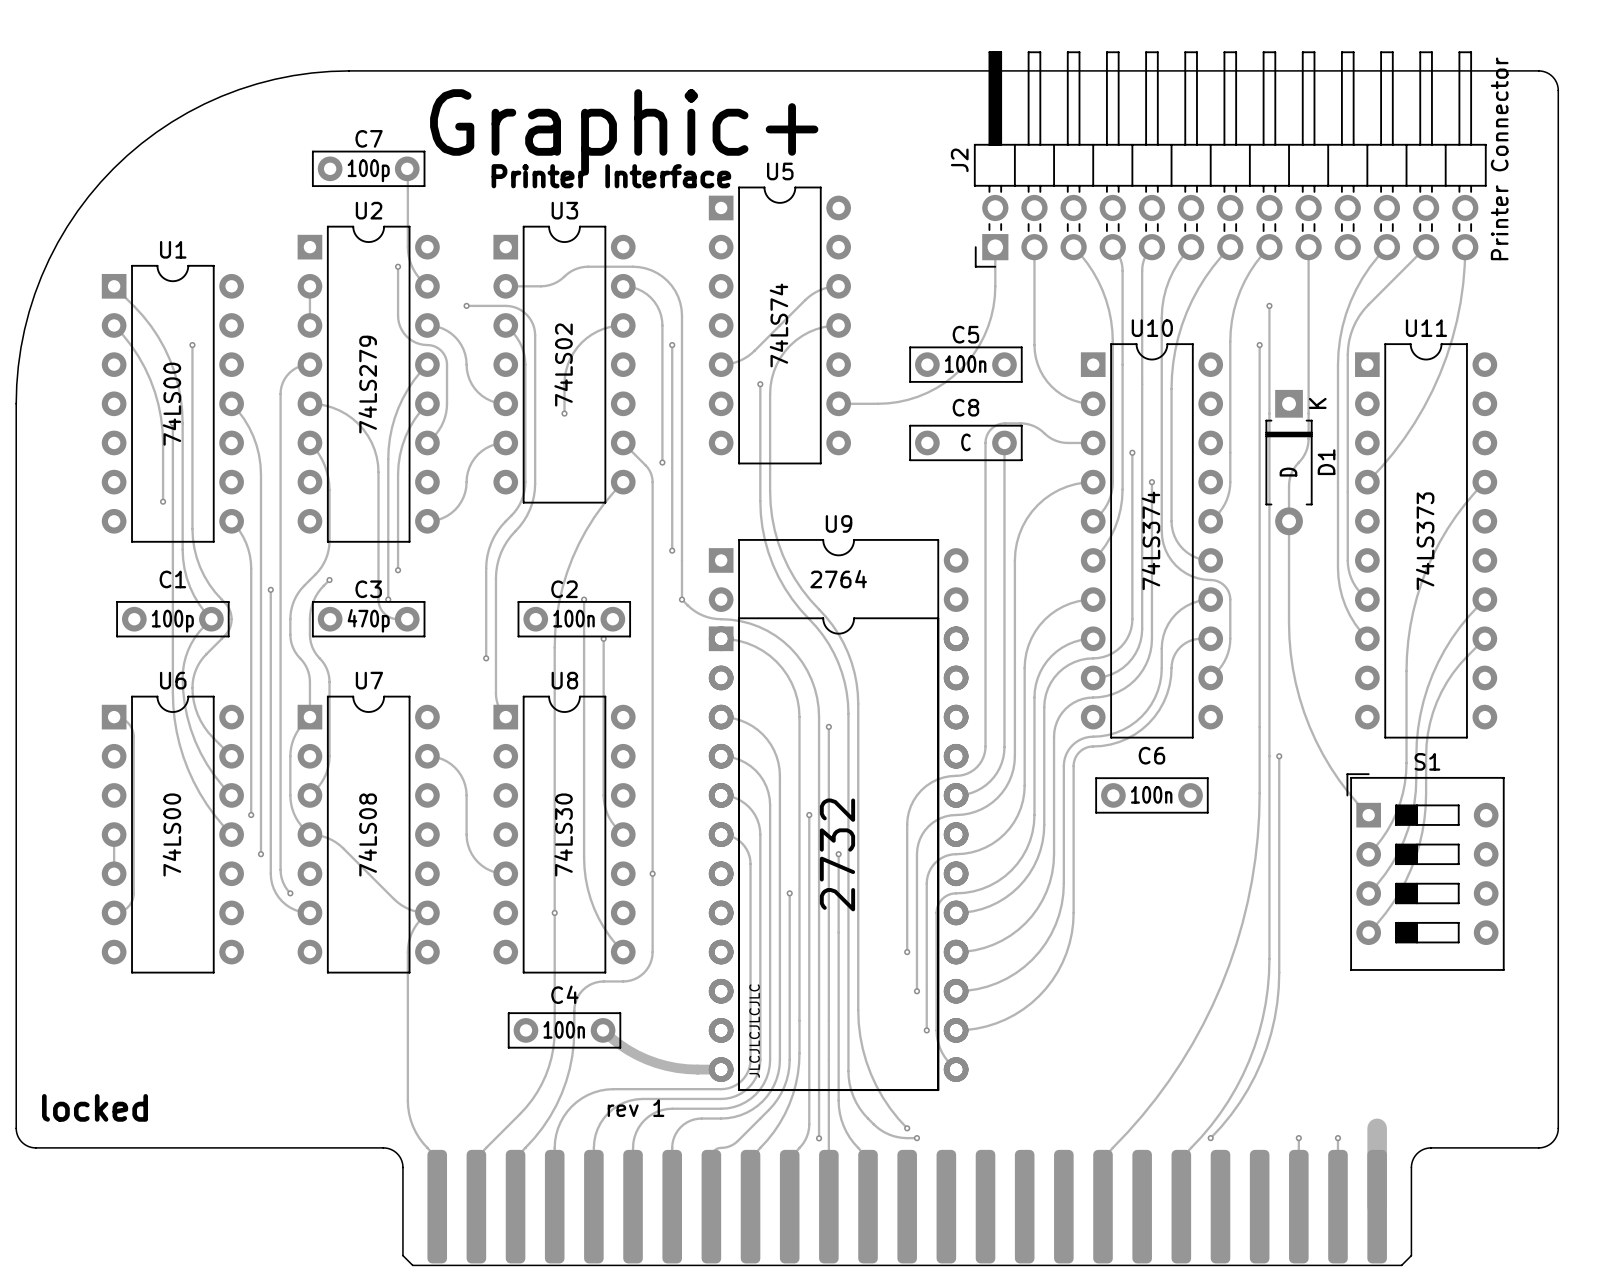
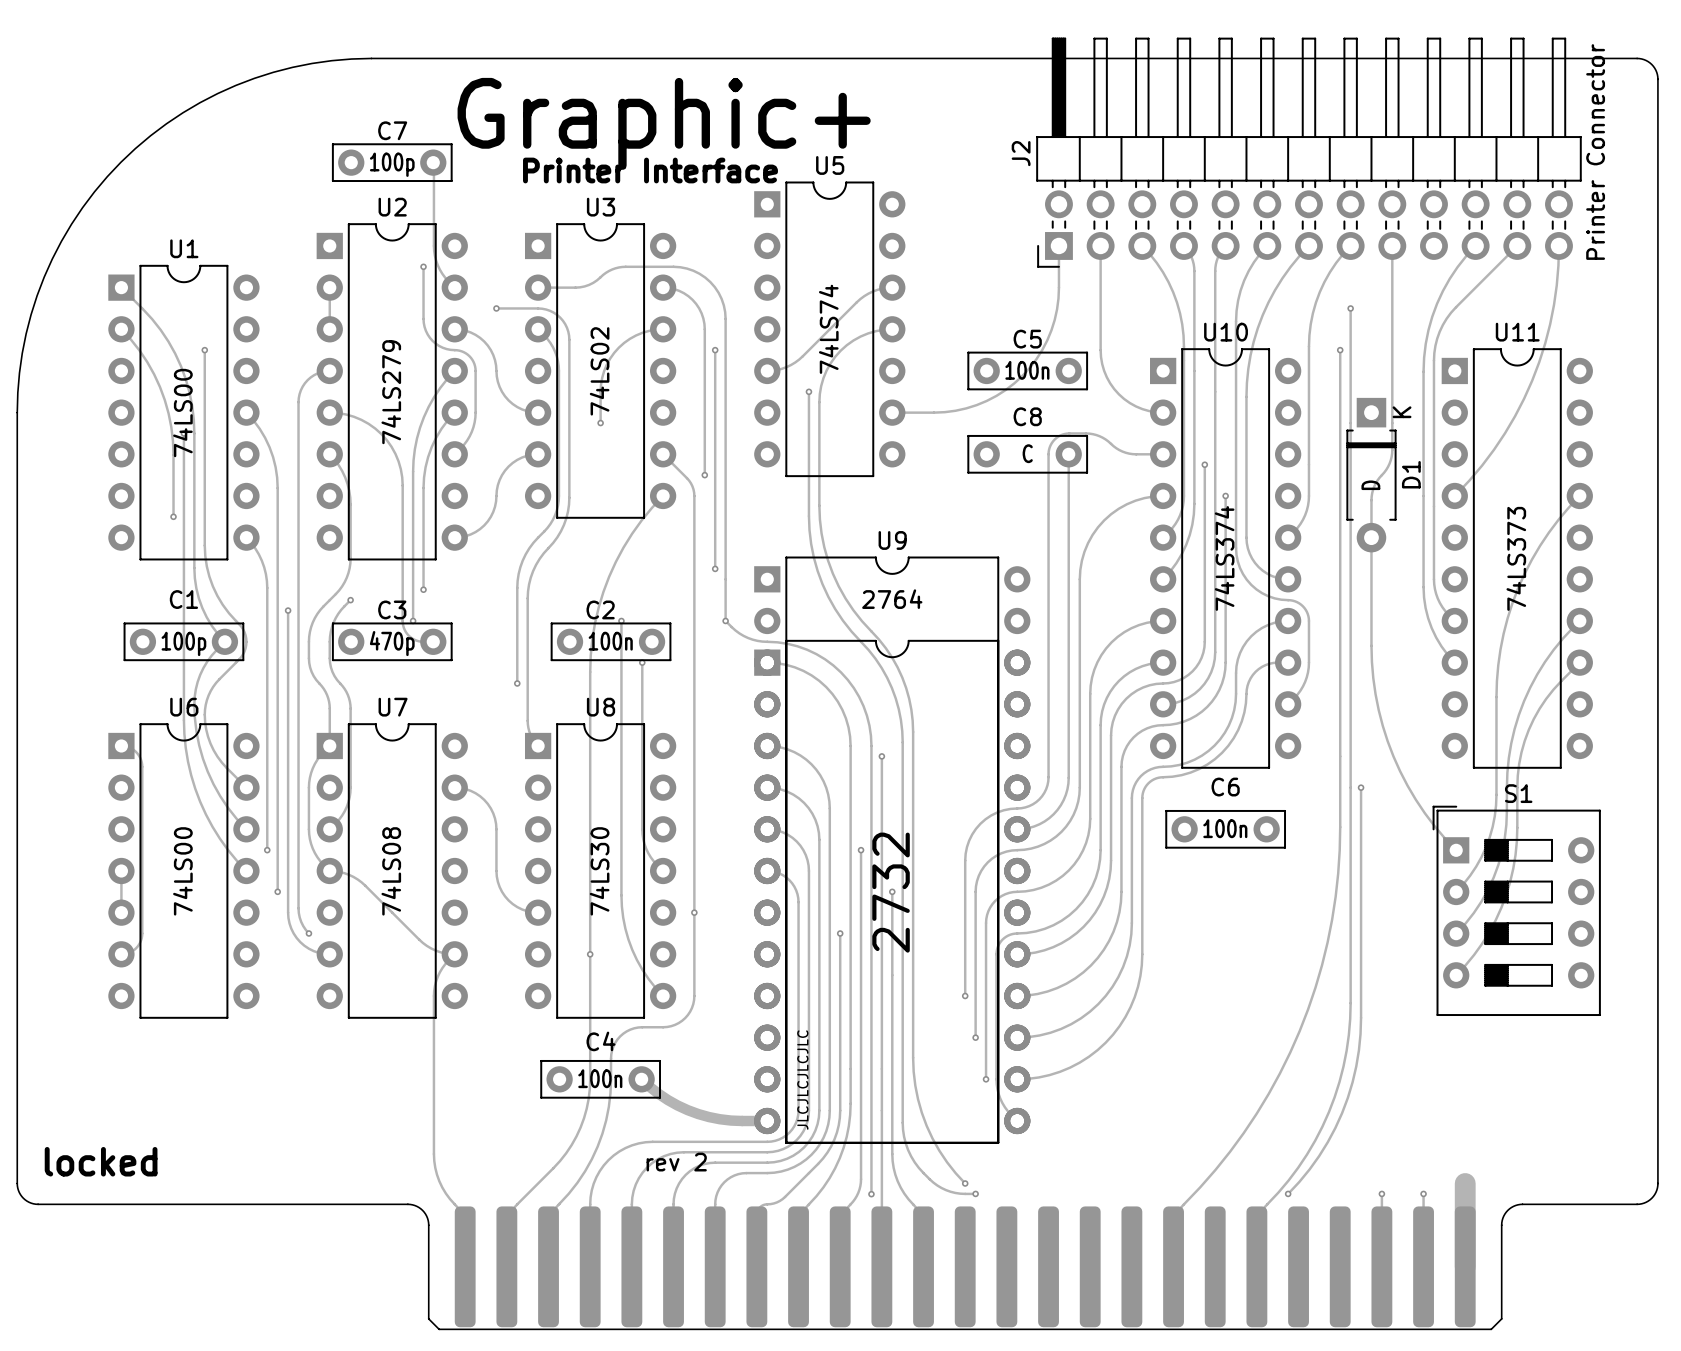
text: rev 1 (636, 1108) -> rev 2 (676, 1162)

